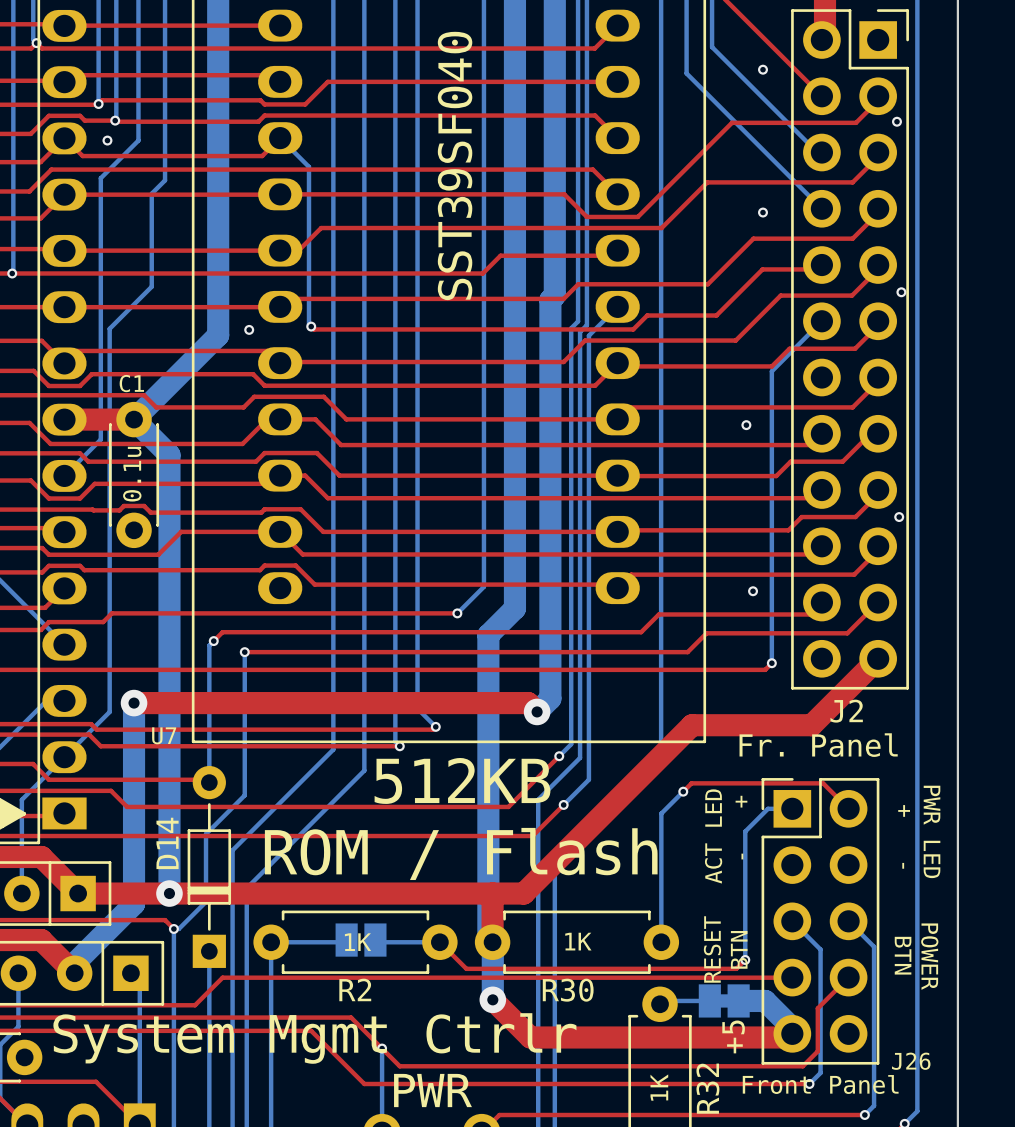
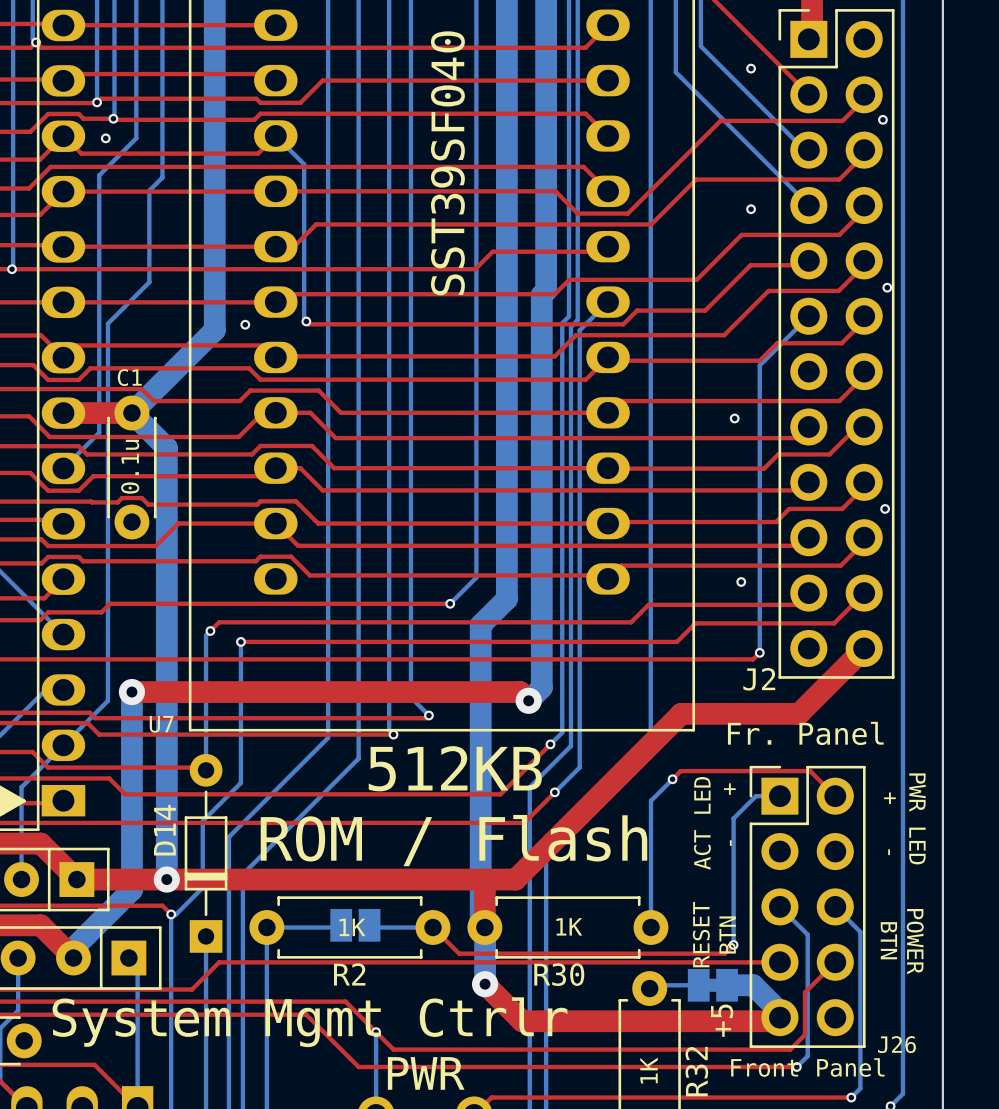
J2 footprint: [791, 9, 909, 690] -> [778, 9, 895, 679]
J2 name position: J2 (846, 711) -> J2 (759, 679)

